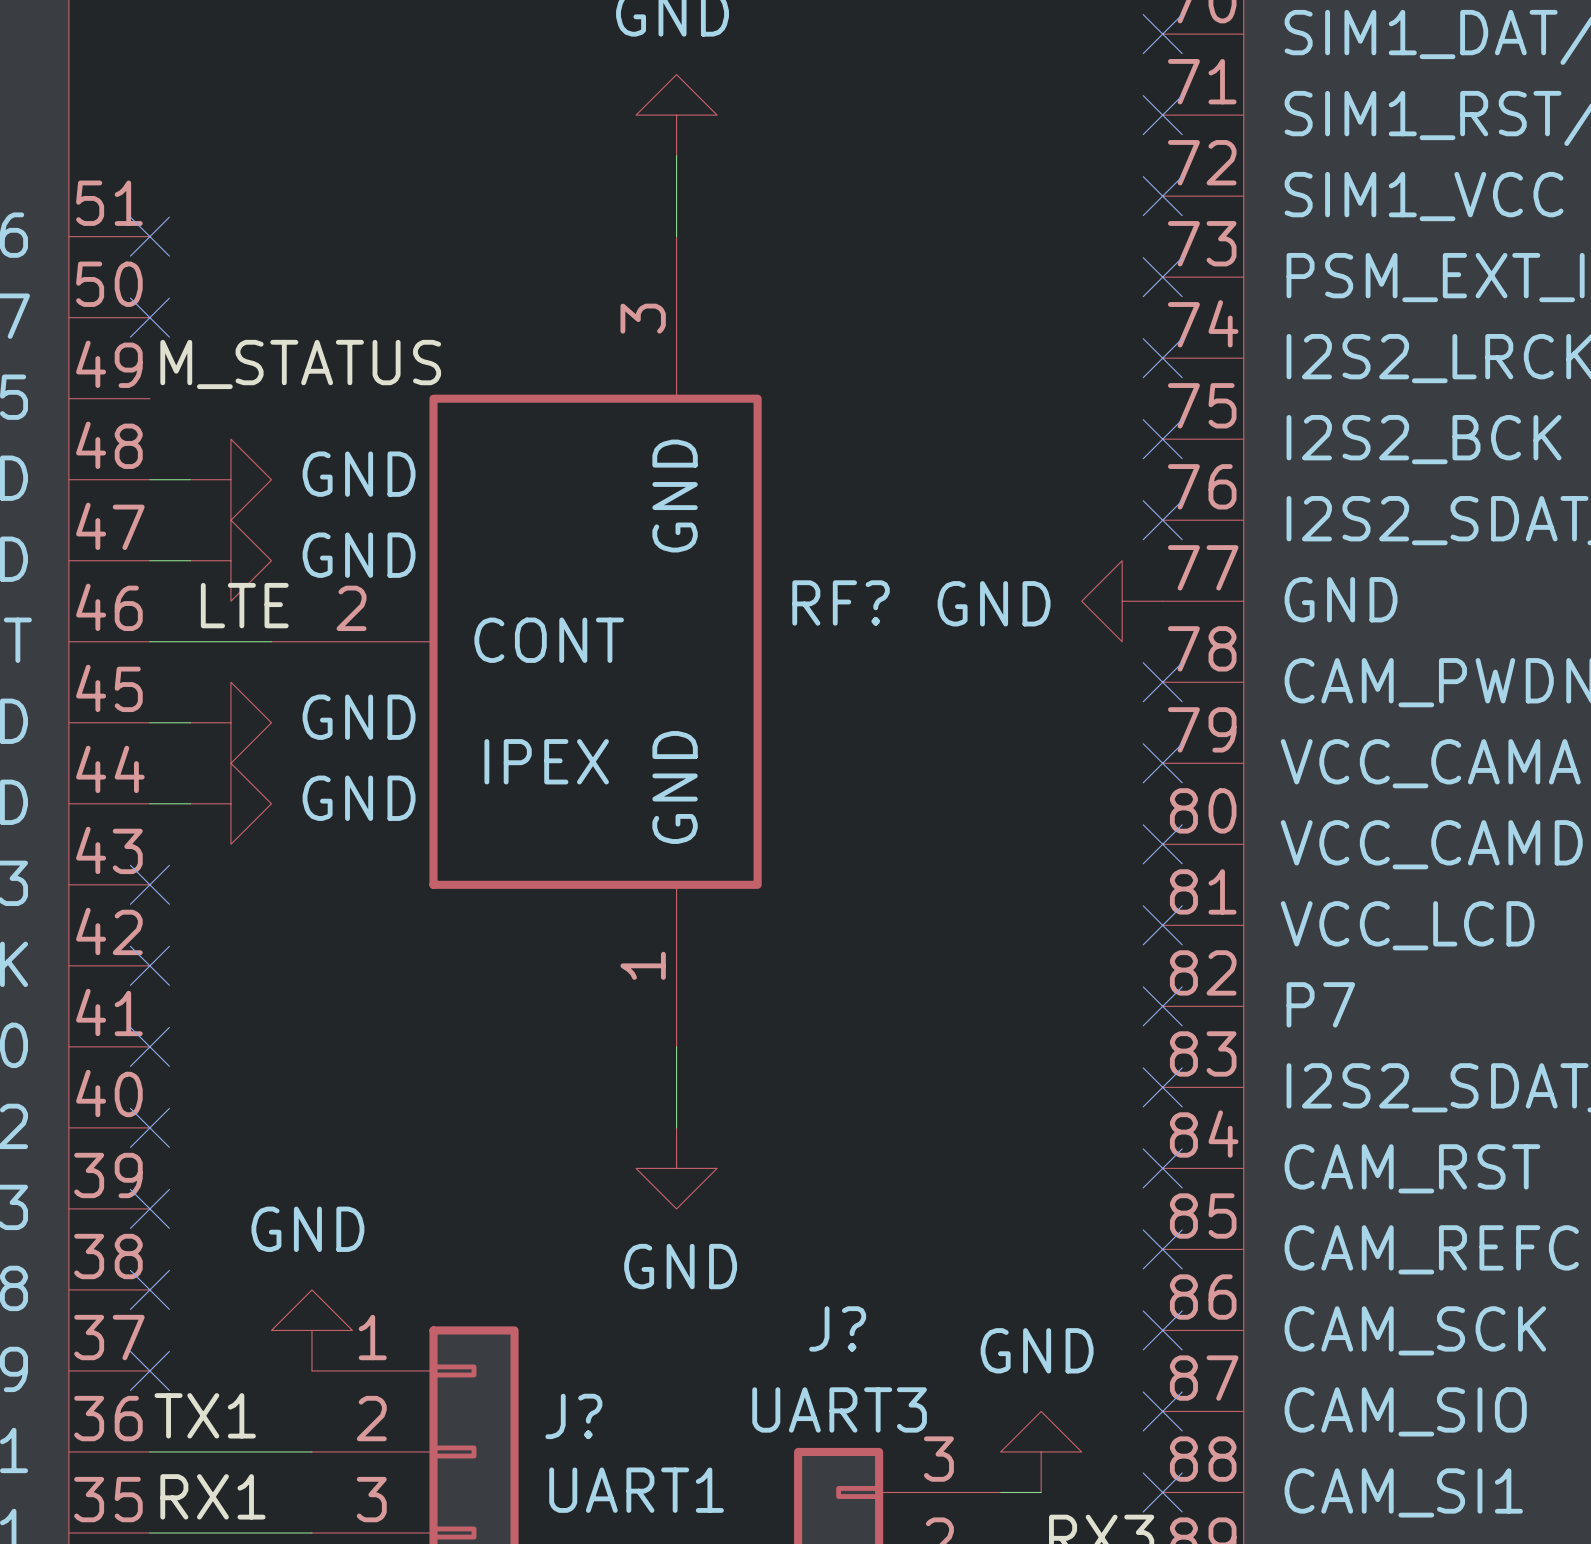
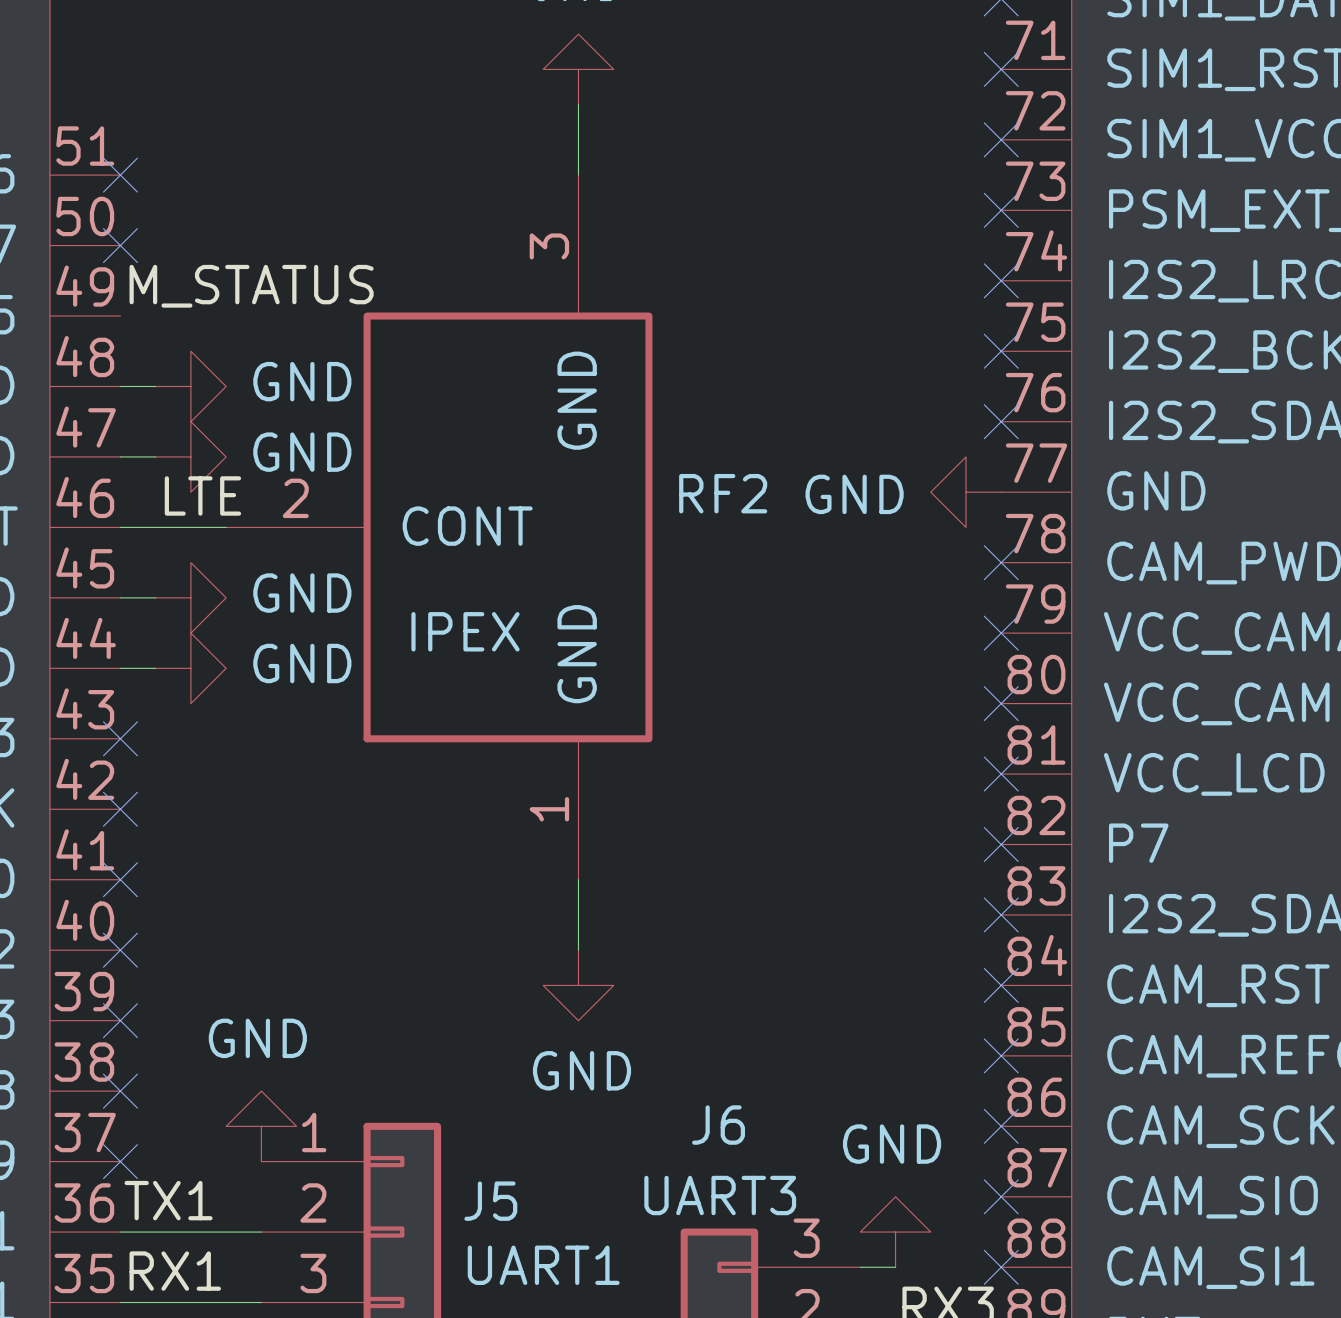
RF? name: RF? (841, 602) -> RF2 (723, 493)
J? name: J? (837, 1328) -> J6 (718, 1125)
J? name: J? (573, 1416) -> J5 (490, 1201)

